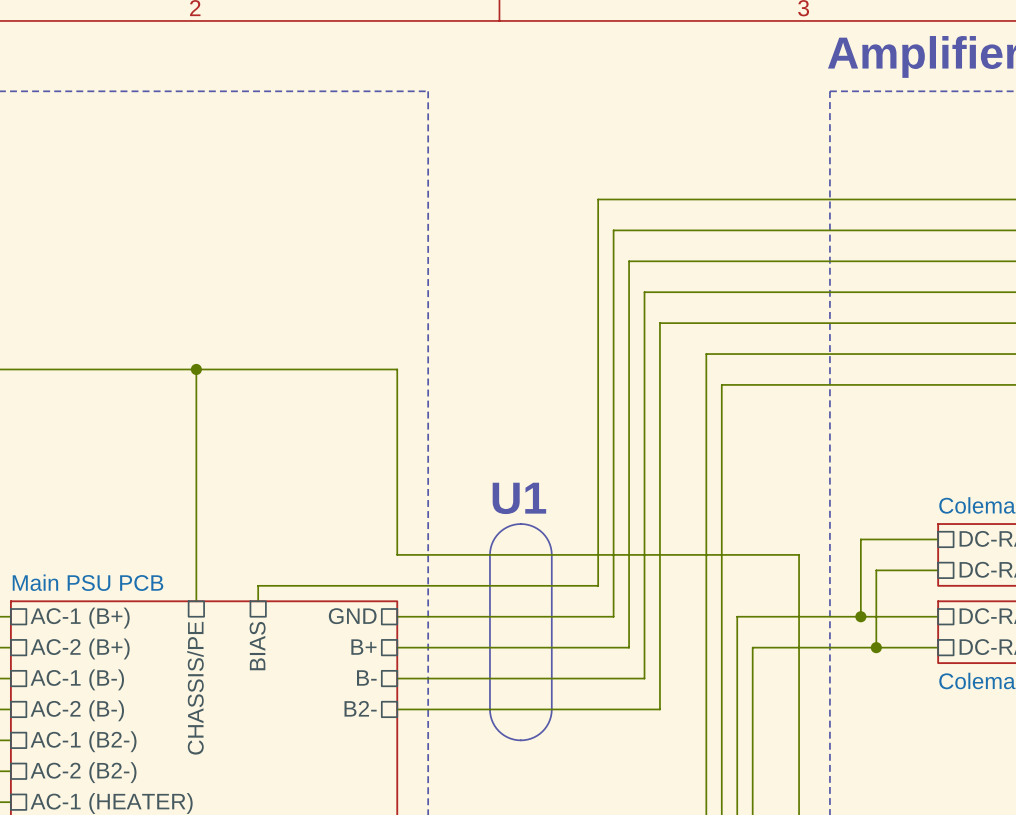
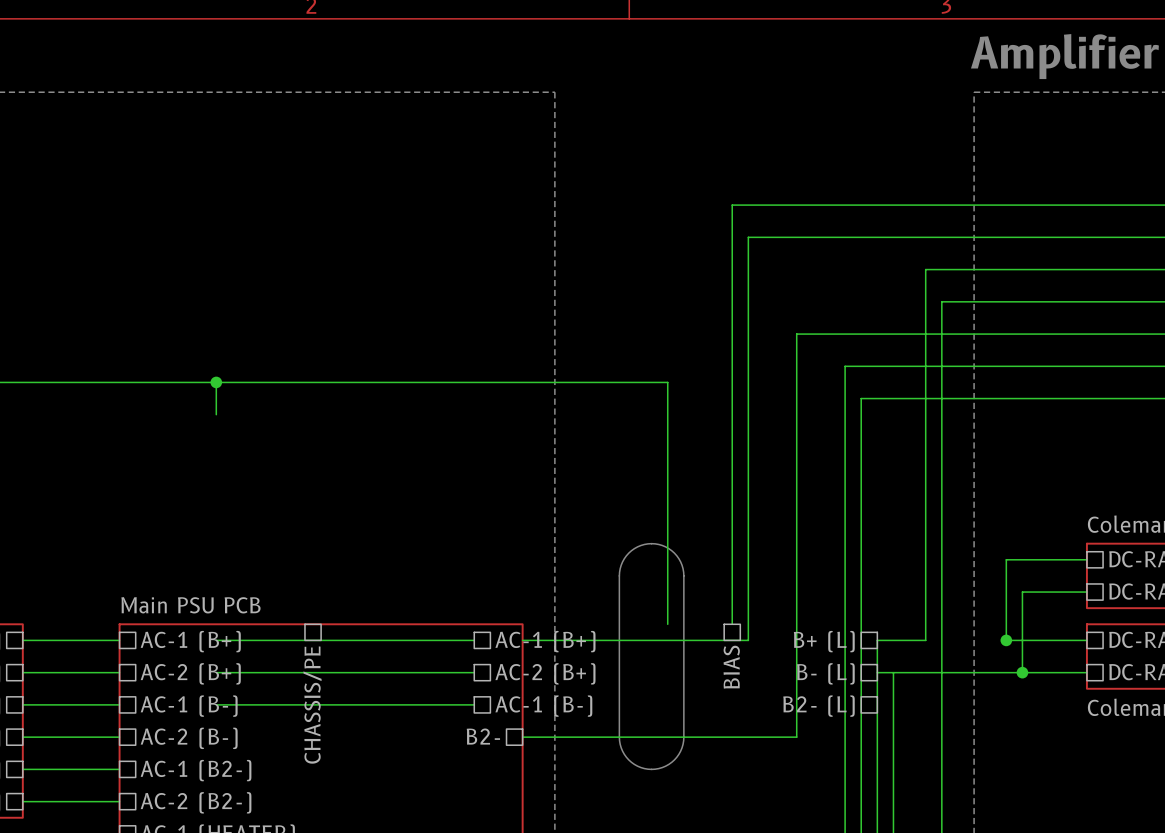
wire: (783, 261) (629, 261) (629, 647) (397, 647) -> none
wire: (799, 292) (644, 292) (644, 678) (397, 678) -> (941, 301) (941, 575)
wire: none -> (216, 382) (216, 414)
junction: none -> (216, 382)
wire: (196, 369) (196, 601) -> none
junction: (196, 369) -> none
wire: (397, 369) (397, 554) (799, 554) -> (522, 382) (667, 382) (667, 624)
text: U1 (519, 498) -> none
wire: (598, 585) (258, 585) (258, 601) -> (732, 608) (732, 624)
wire: none -> (216, 640) (474, 640)
sheet pin: GND (352, 616) -> AC-1 (B+) (545, 641)
wire: (783, 616) (860, 616) -> (925, 640) (925, 269)
sheet pin: none -> B+ (L) (824, 641)
sheet pin: BIAS (257, 646) -> none
sheet pin: none -> BIAS (731, 667)
wire: none -> (216, 672) (474, 672)
sheet pin: B+ (363, 647) -> AC-2 (B+) (545, 673)
wire: none -> (877, 672) (893, 672)
sheet pin: none -> B- (L) (825, 673)
sheet pin: B- (366, 677) -> AC-1 (B-) (543, 706)
wire: none -> (216, 704) (474, 704)
sheet pin: none -> B2- (L) (818, 706)

